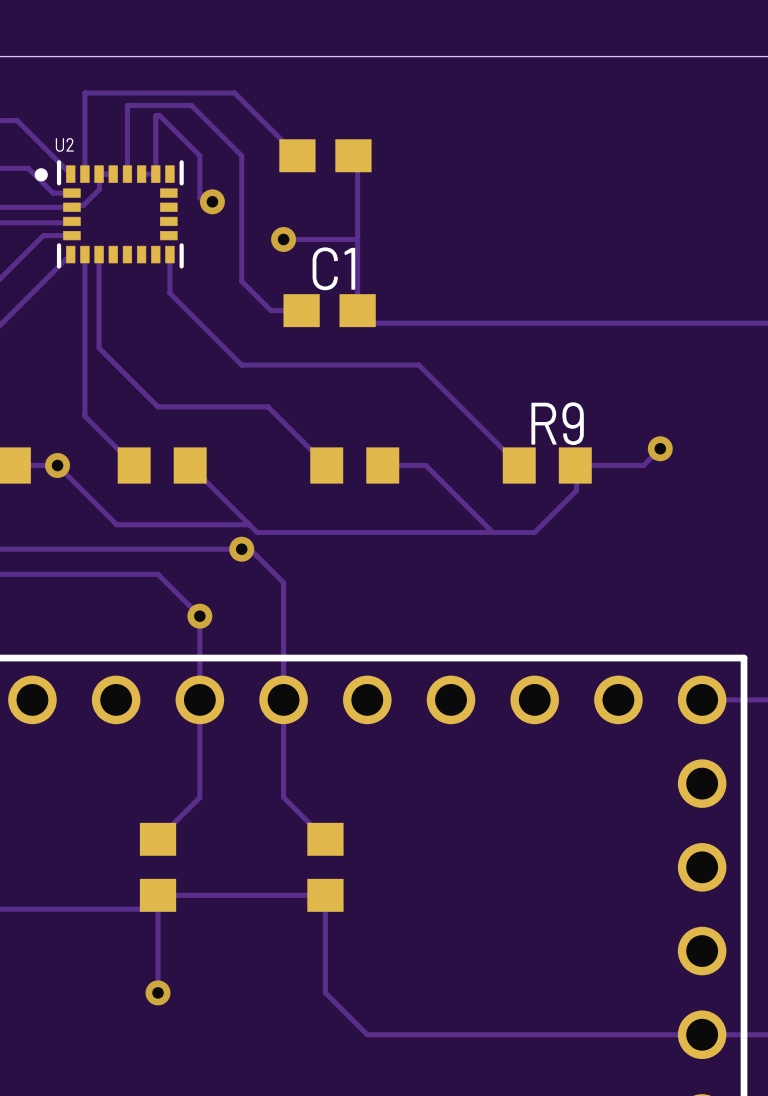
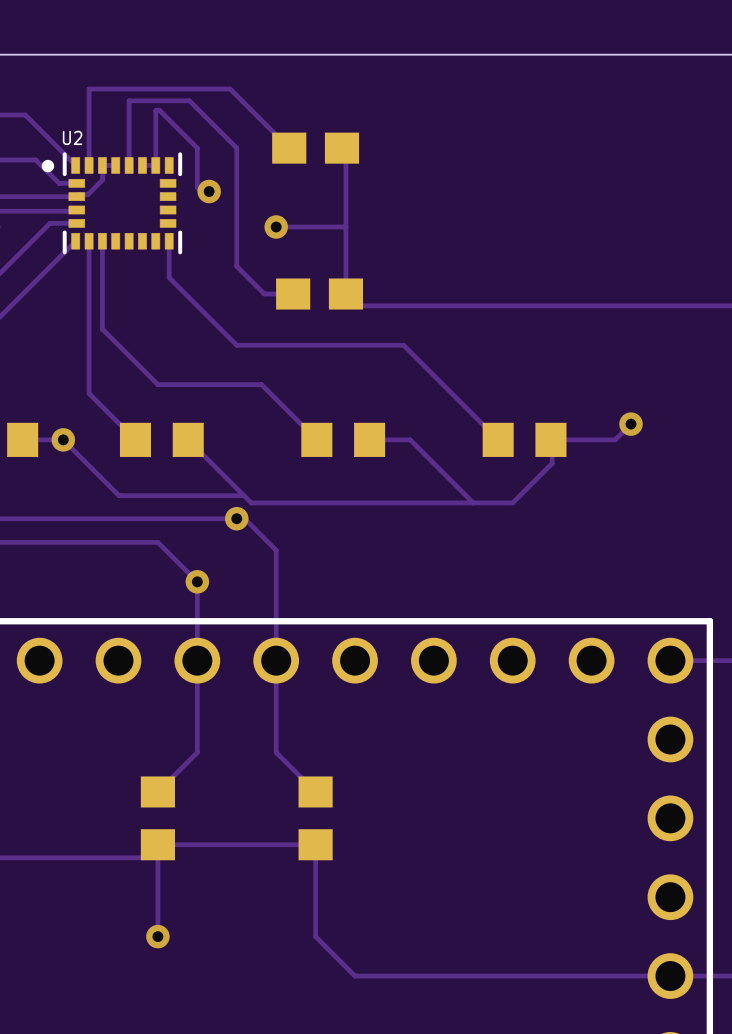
C1 name: C1 (333, 268) -> none
R9 name: R9 (557, 423) -> none

